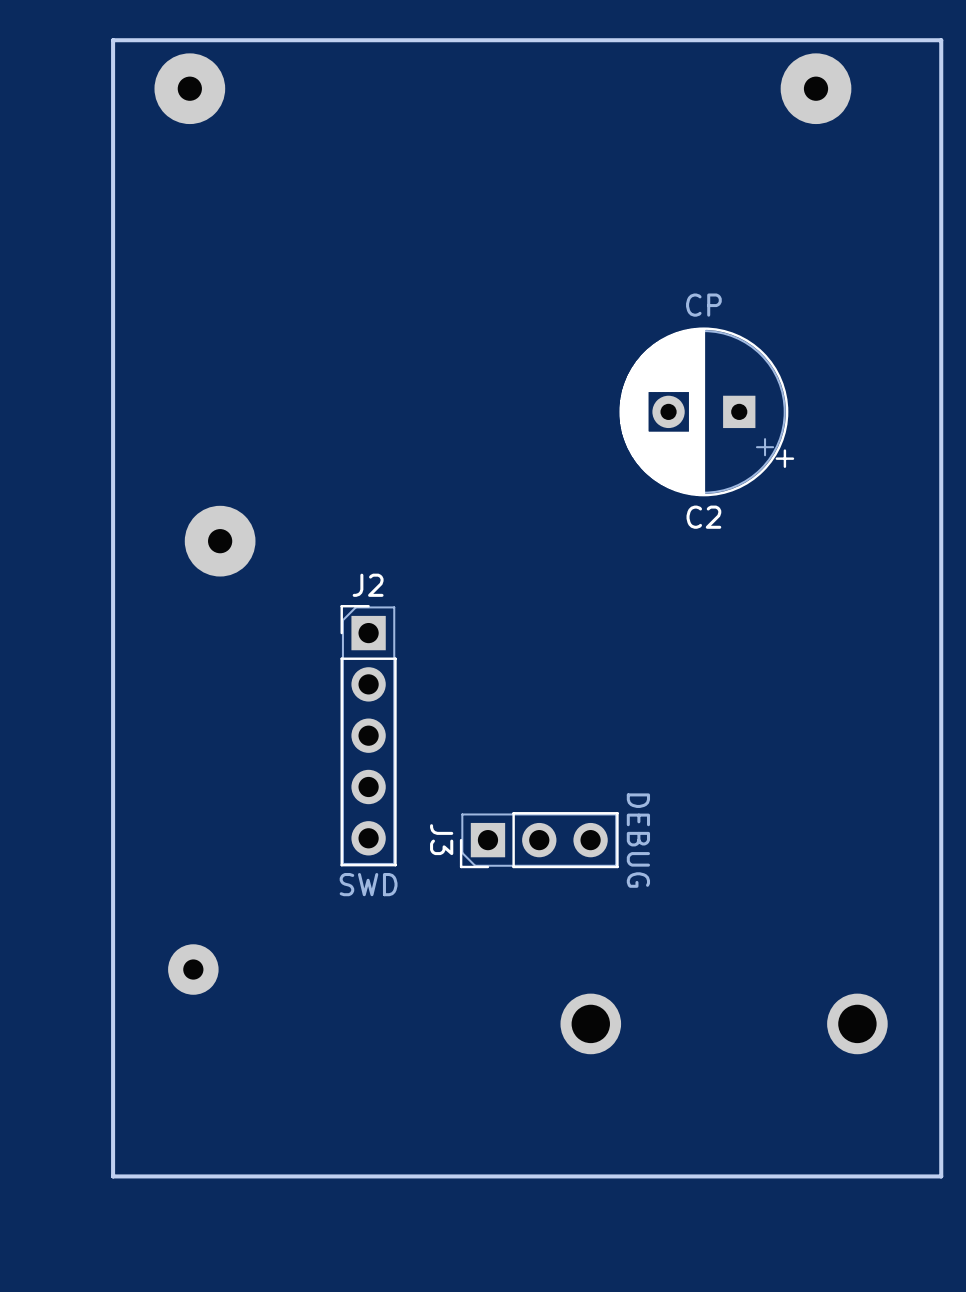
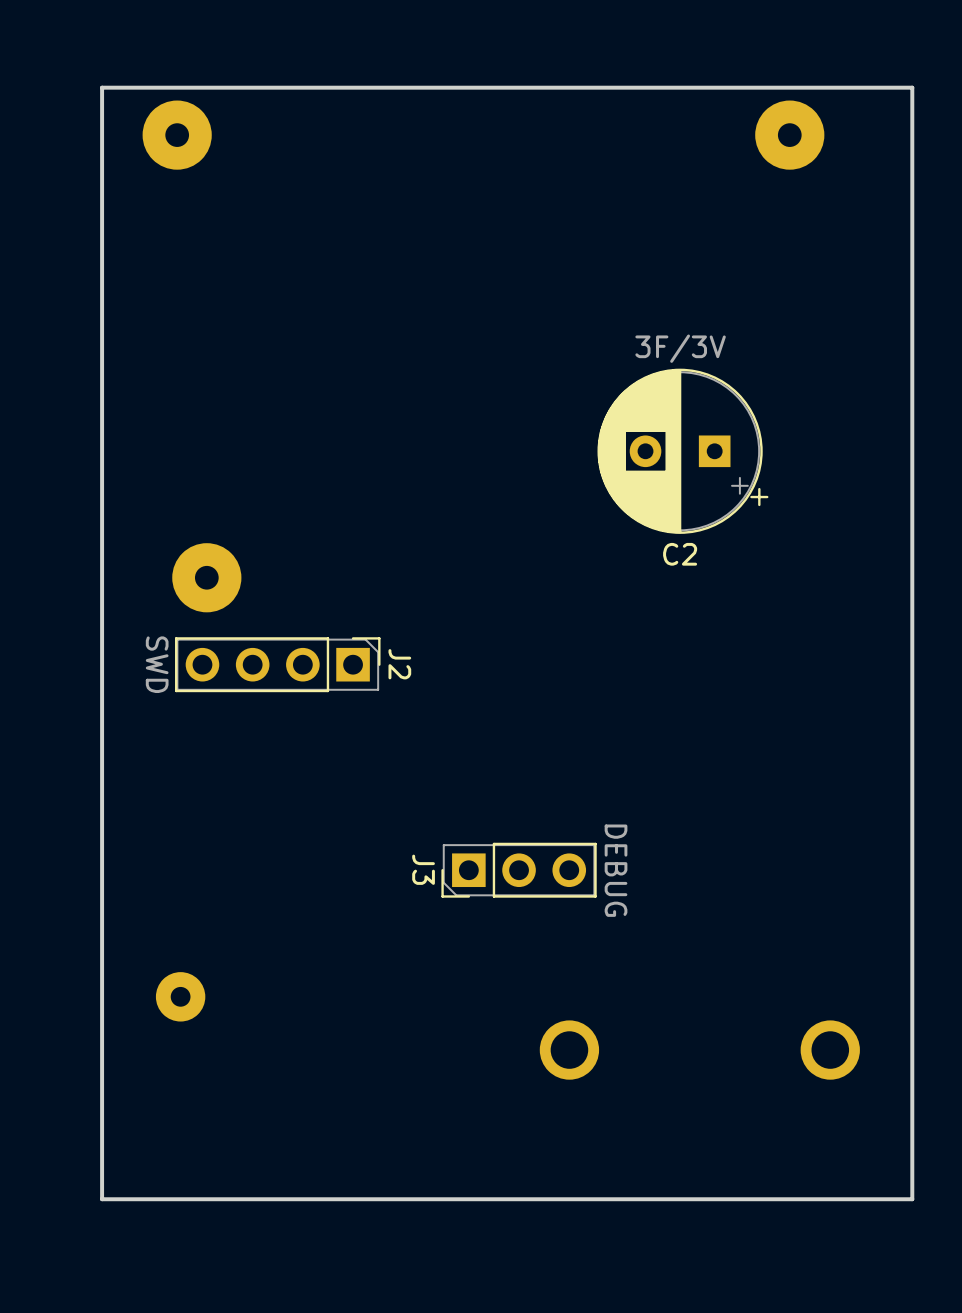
C2 value: CP (703, 305) -> 3F/3V (680, 348)
J2 name position: J2 (368, 585) -> J2 (399, 664)
J2 footprint: [340, 605, 397, 867] -> [175, 637, 381, 693]
J2 value position: SWD (368, 884) -> SWD (157, 664)

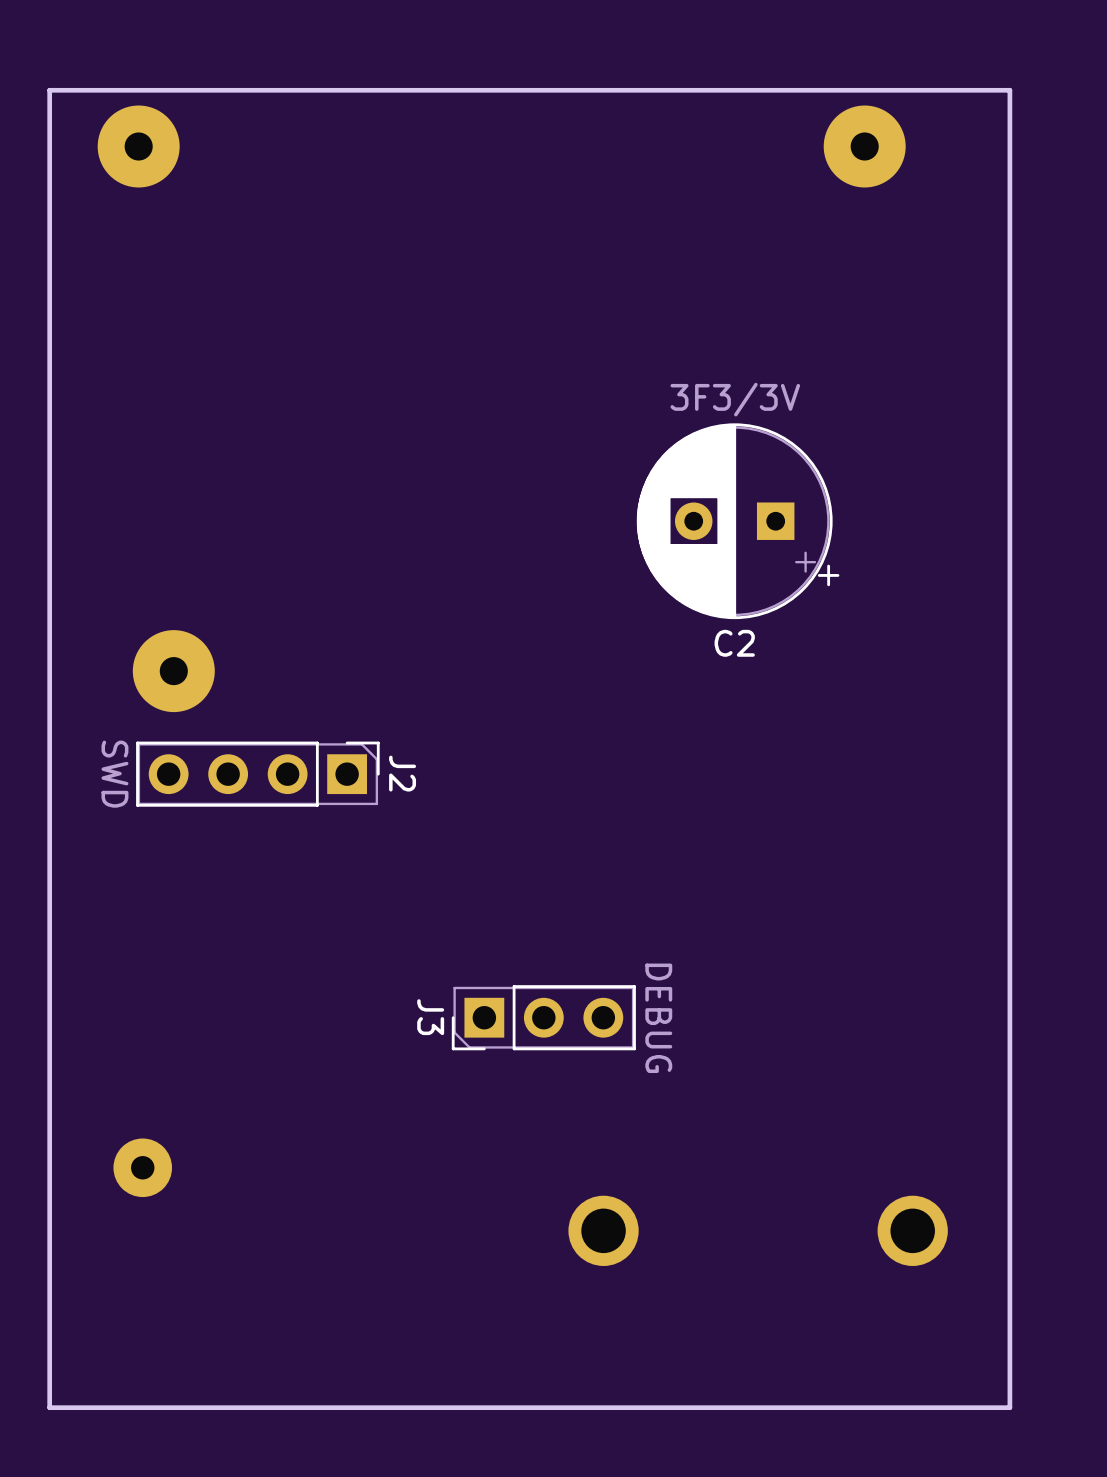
C2 value: 3F/3V (680, 348) -> 3F3/3V (735, 399)

